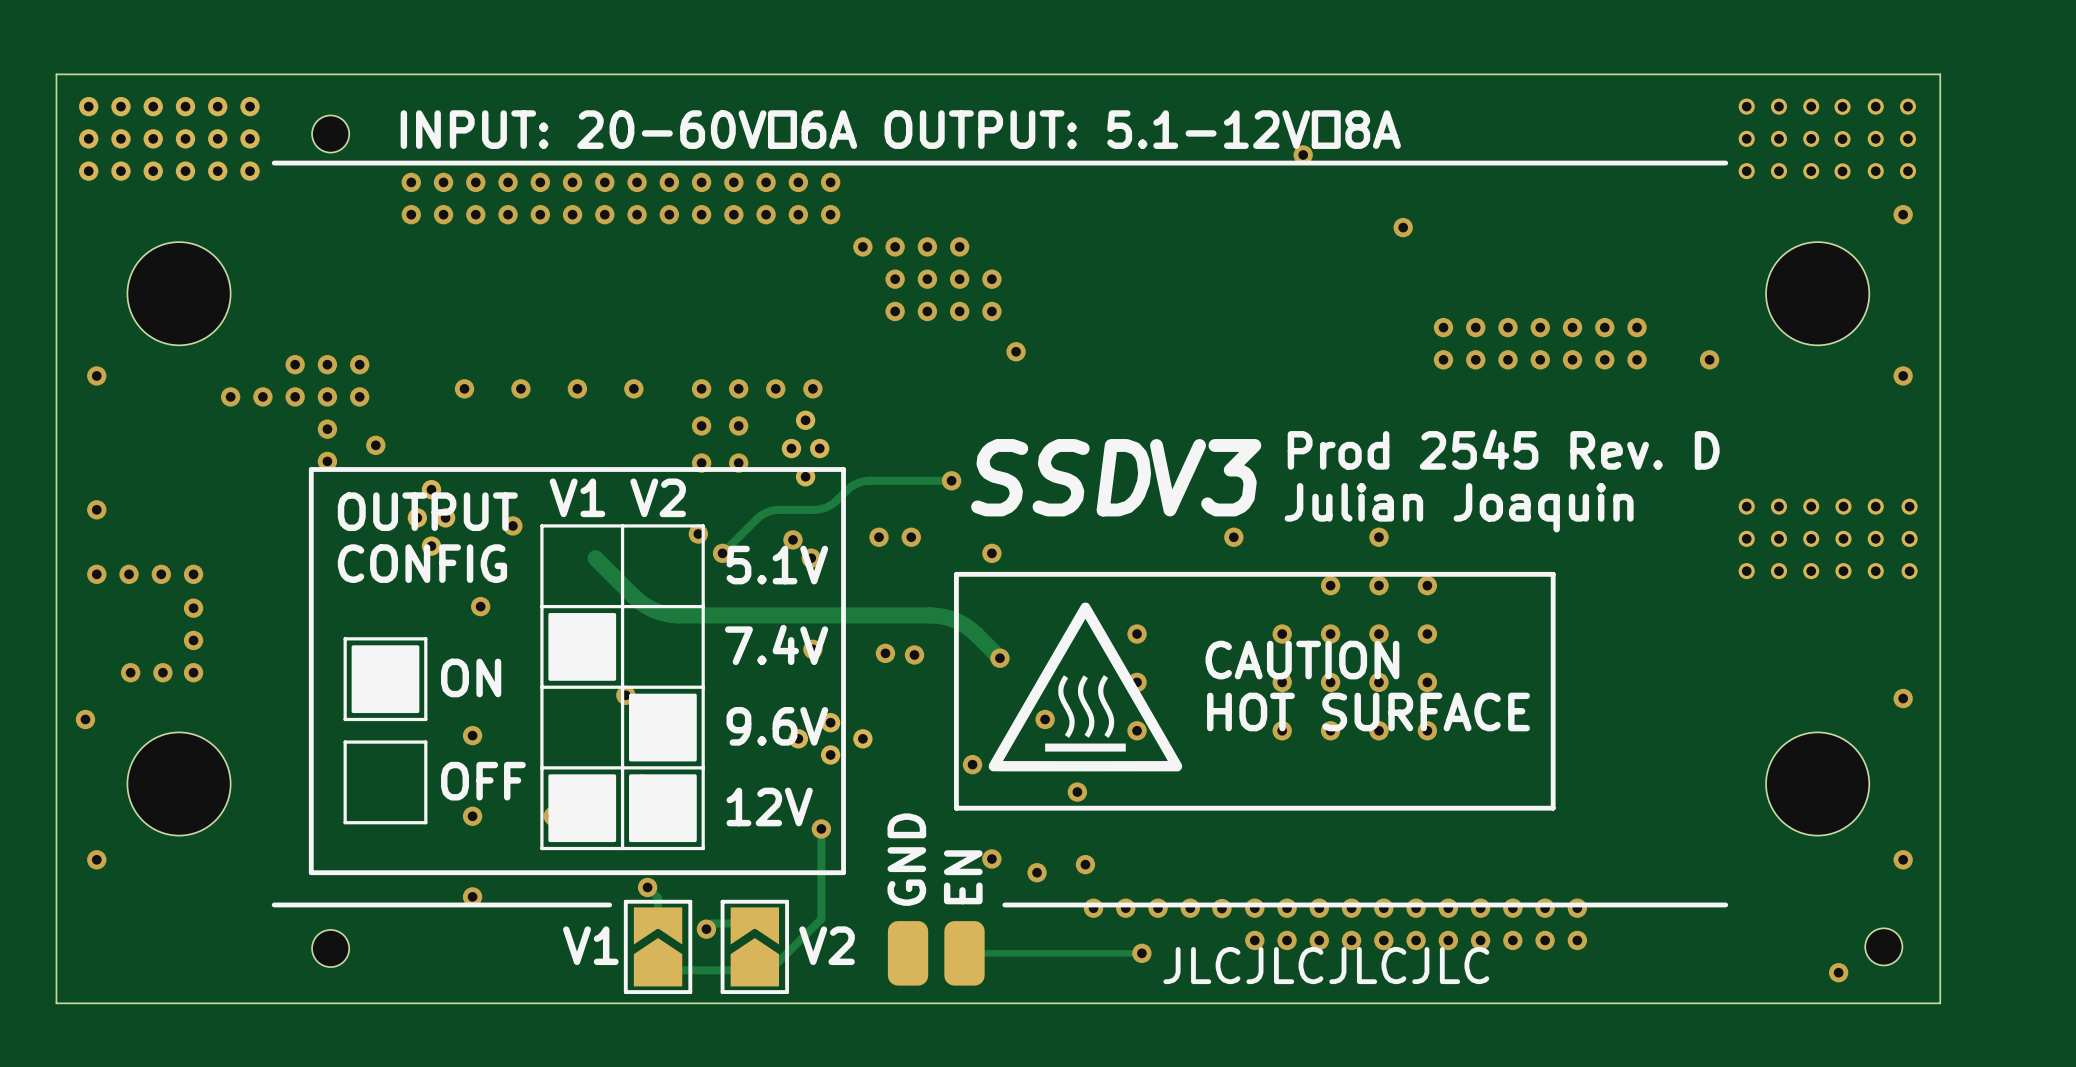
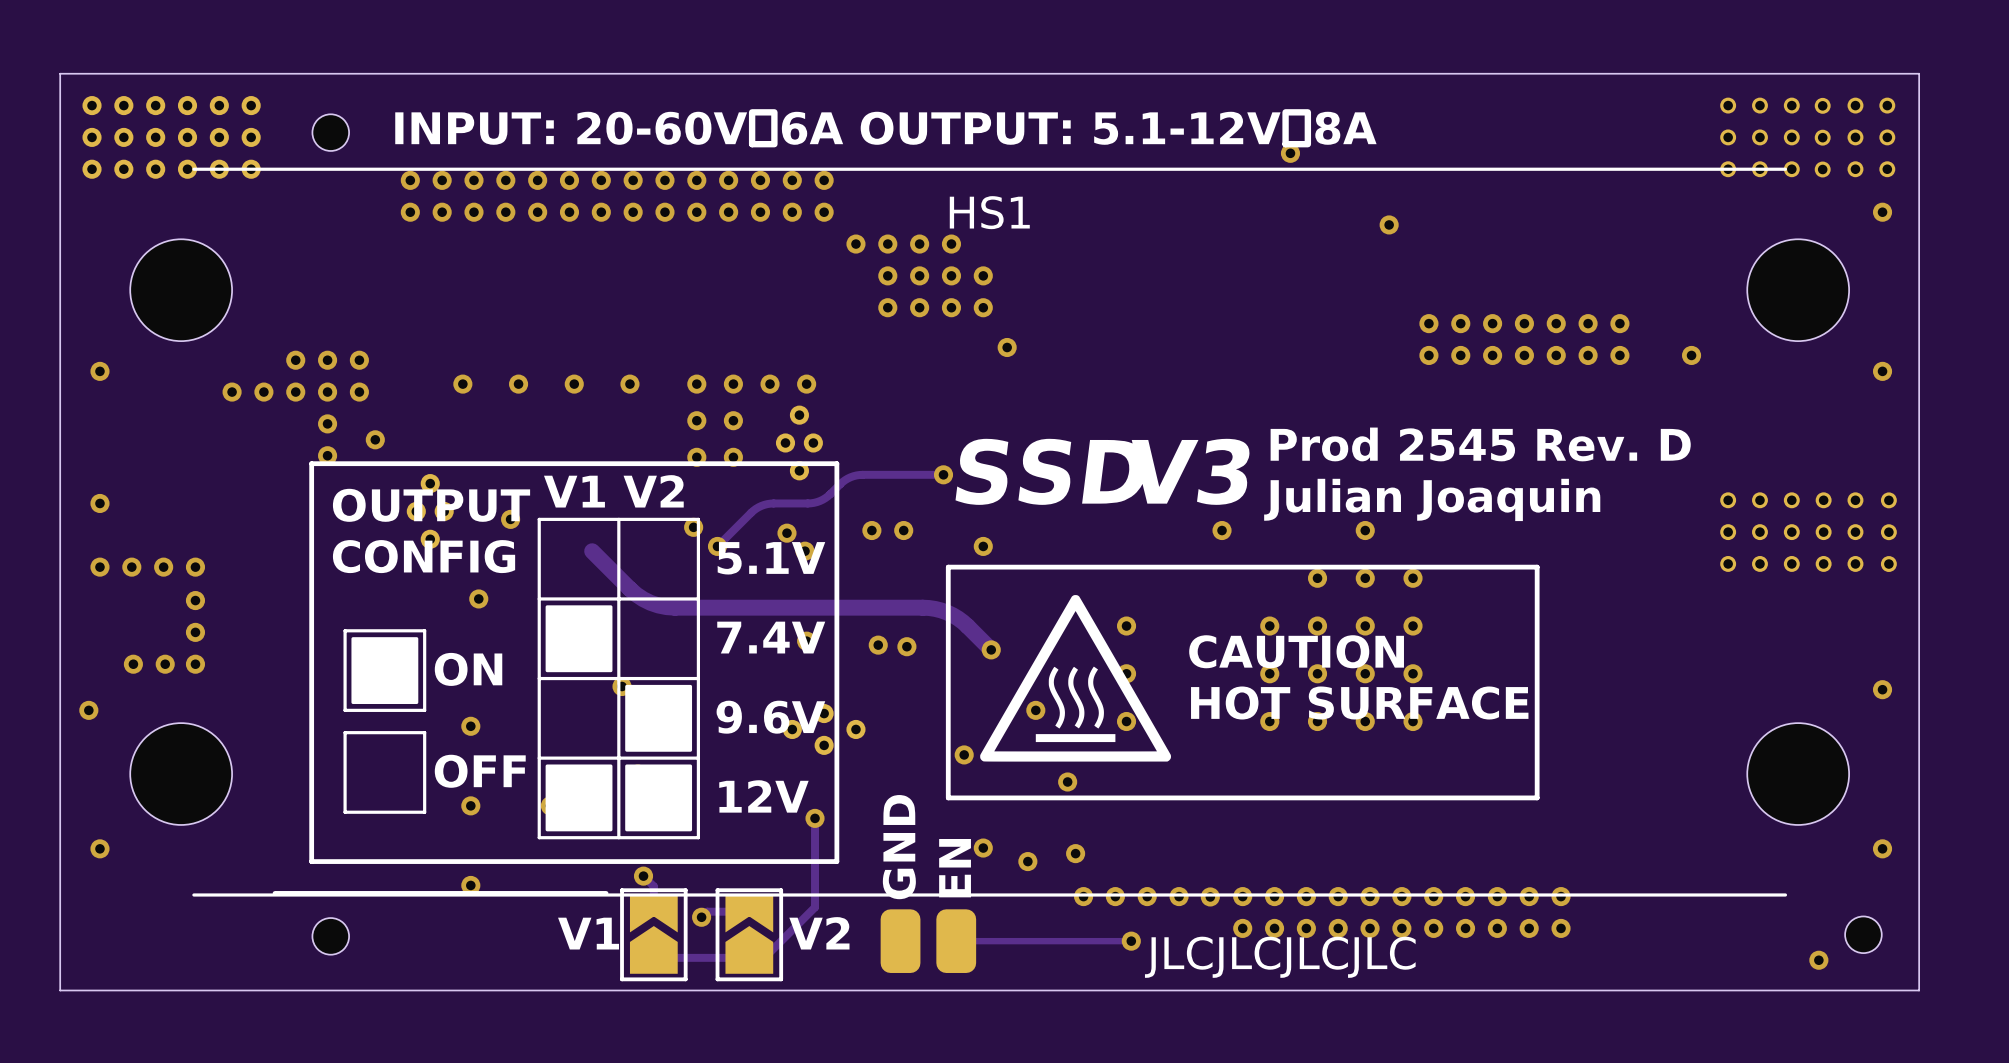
line: (1725, 163) (274, 163) -> none
HS1: none -> (989, 532)
line: (1725, 904) (1004, 904) -> none

